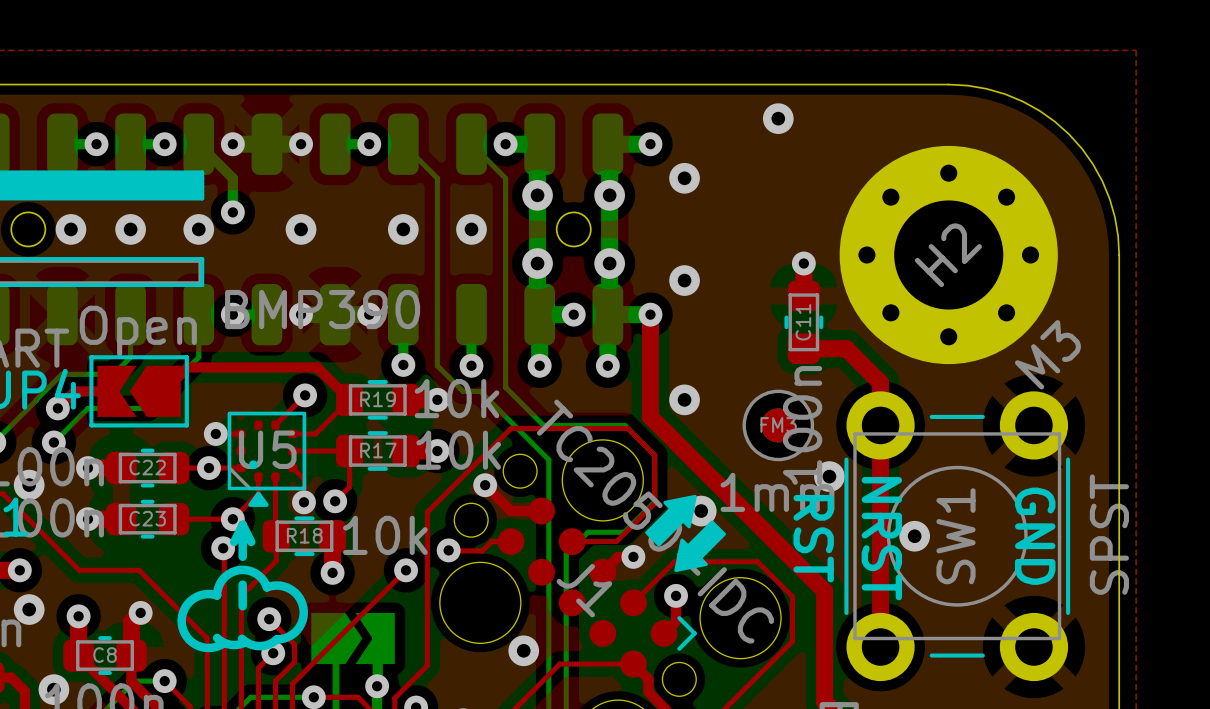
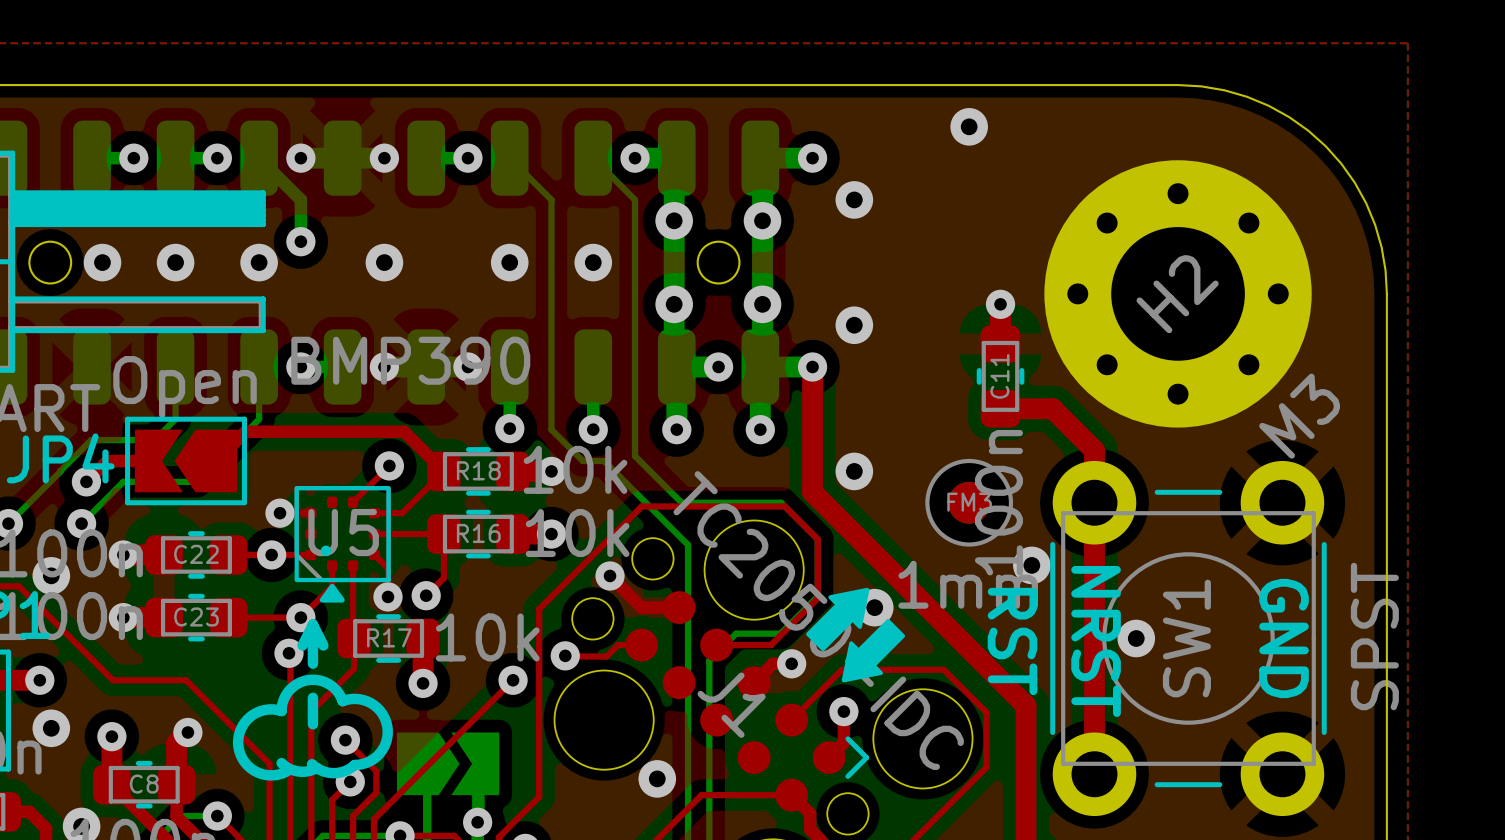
R19 name: R19 (378, 399) -> R18 (478, 470)
R17 name: R17 (378, 450) -> R16 (478, 533)
R18 name: R18 (304, 535) -> R17 (389, 637)

